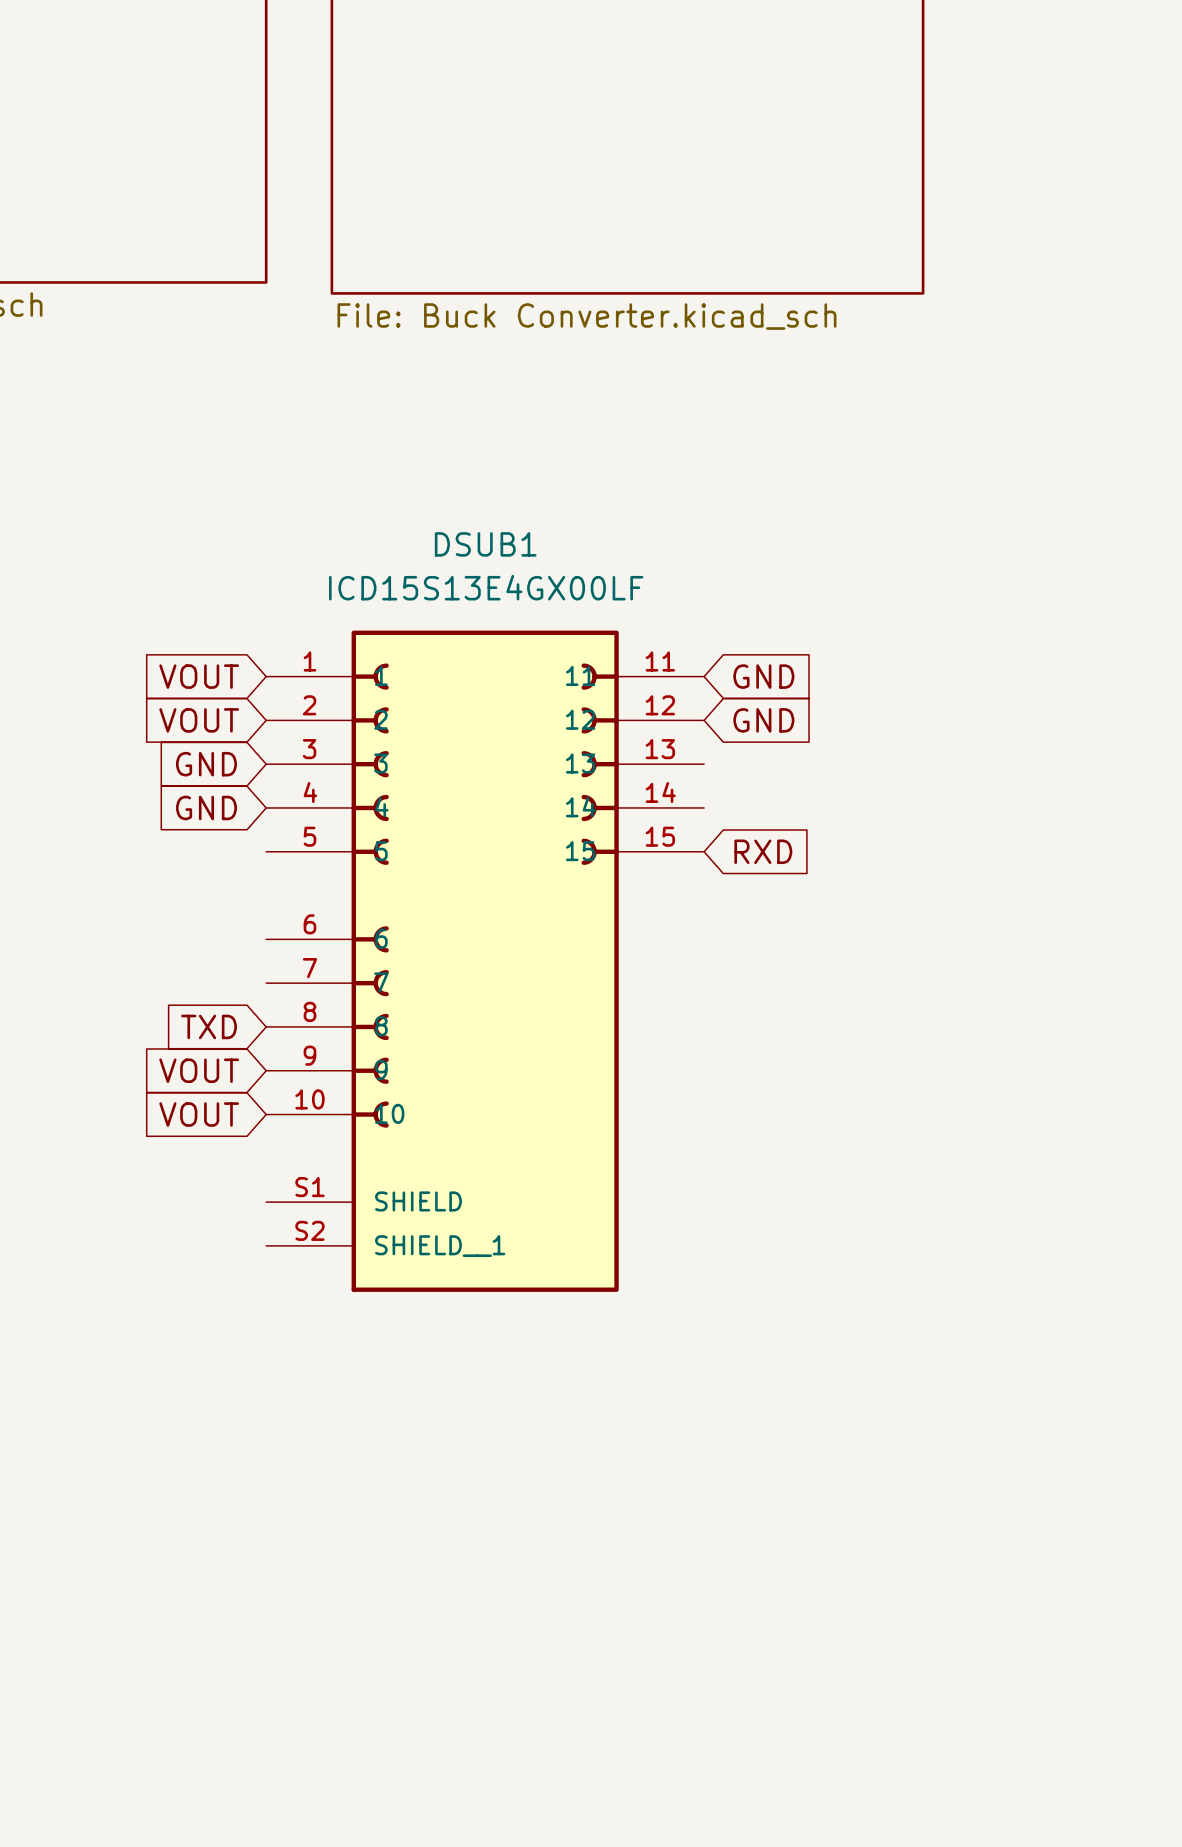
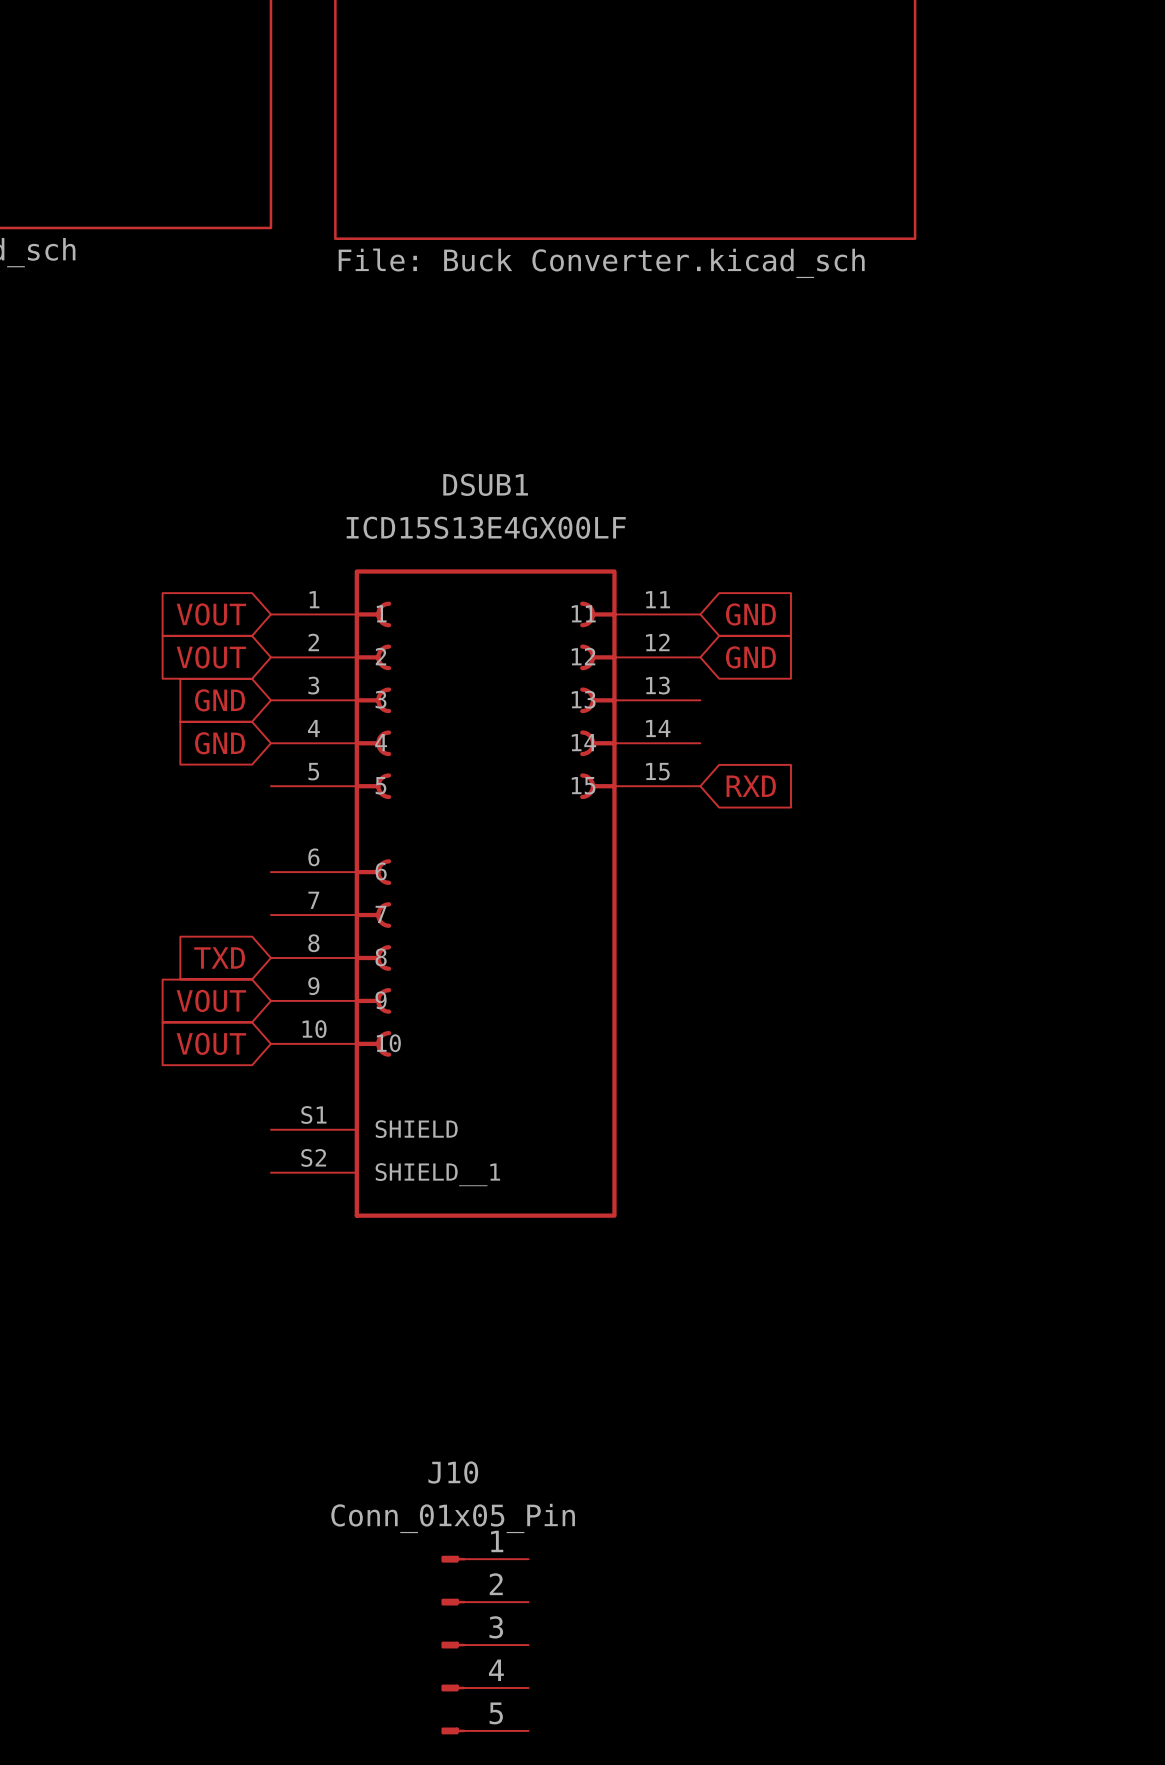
J10: none -> Conn_01x05_Pin (485, 1645)

